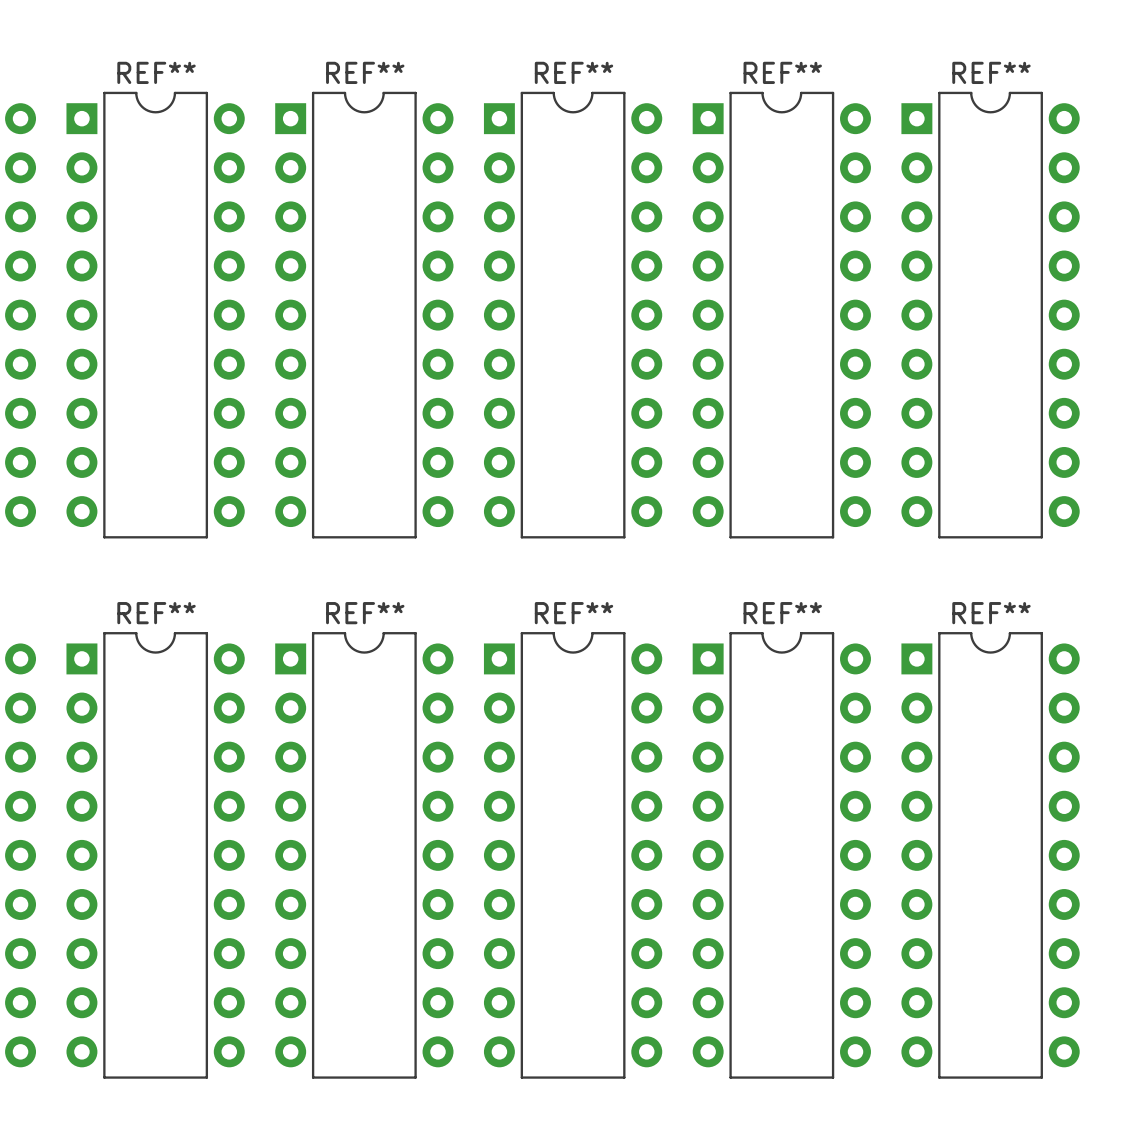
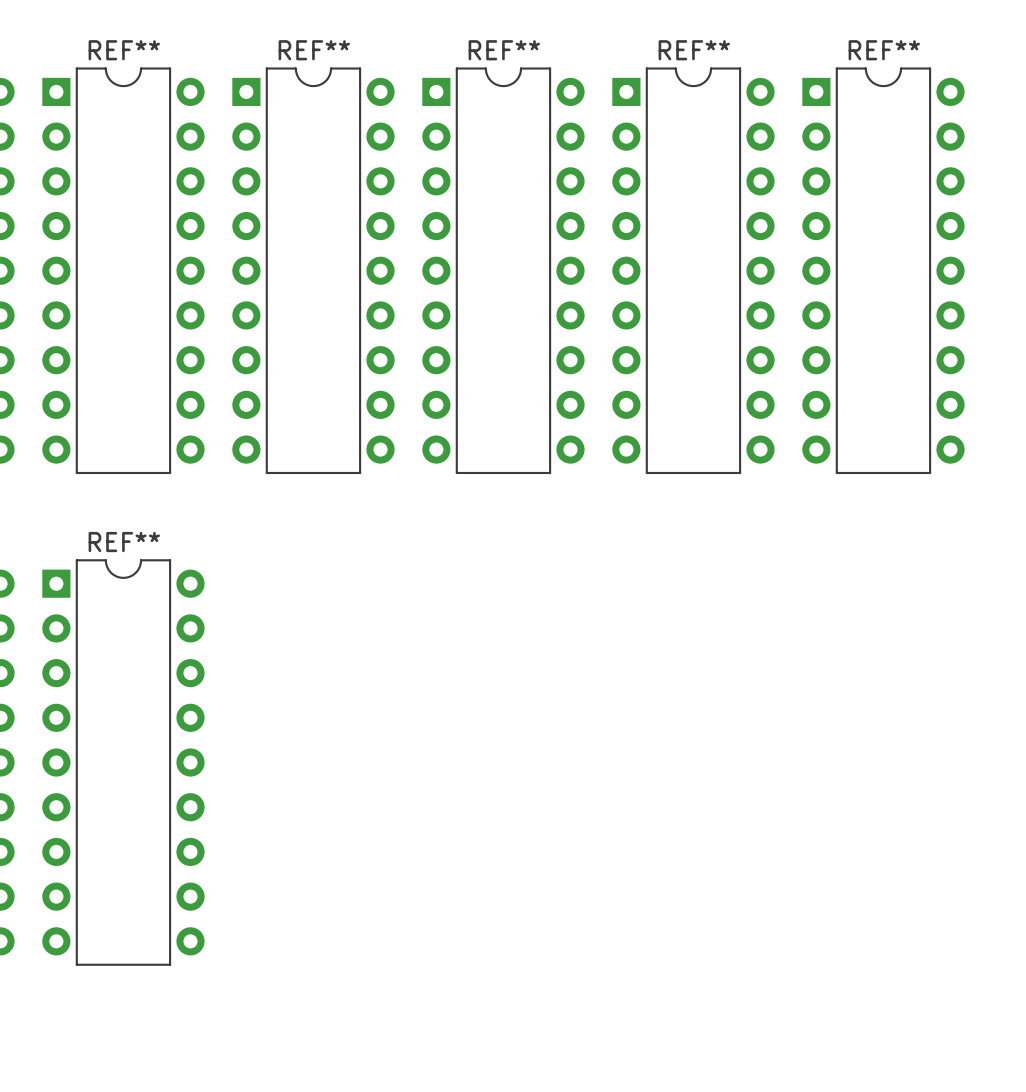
REF**: (364, 855) -> none
REF**: (573, 855) -> none
REF**: (781, 855) -> none
REF**: (990, 855) -> none

